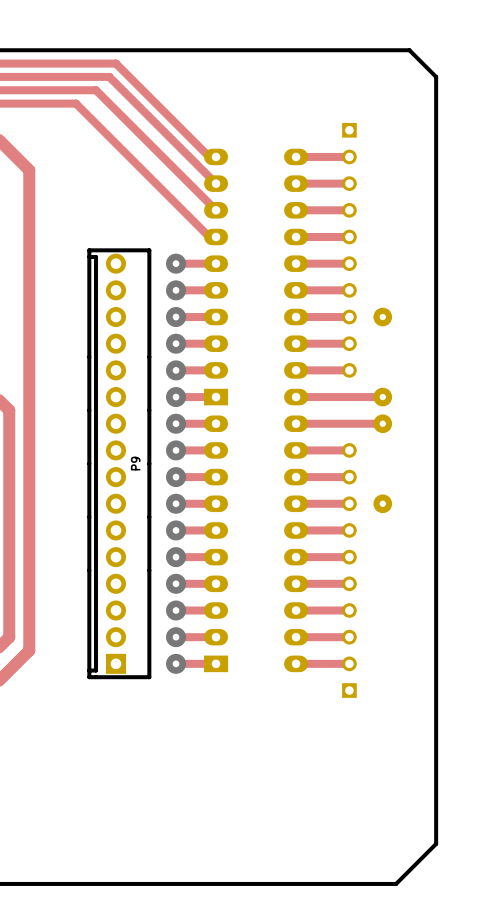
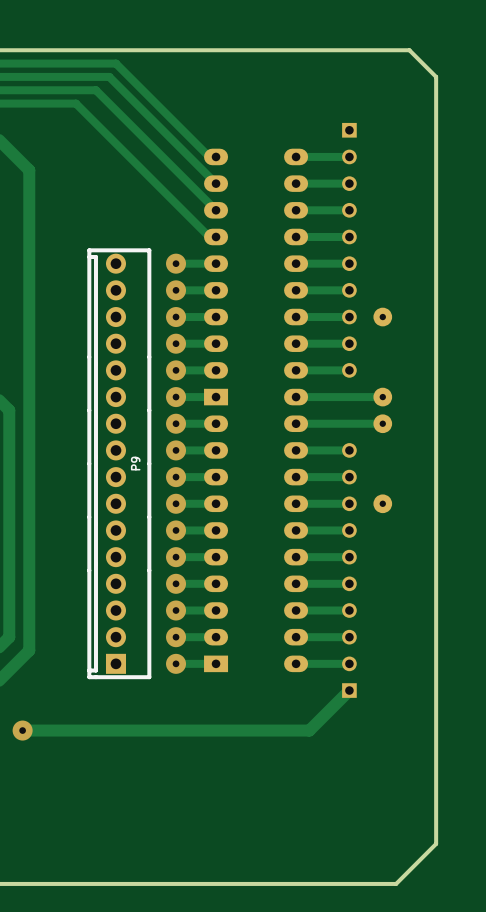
track: none -> (349, 690) (309, 730) (22, 730)
via: none -> (22, 730)

